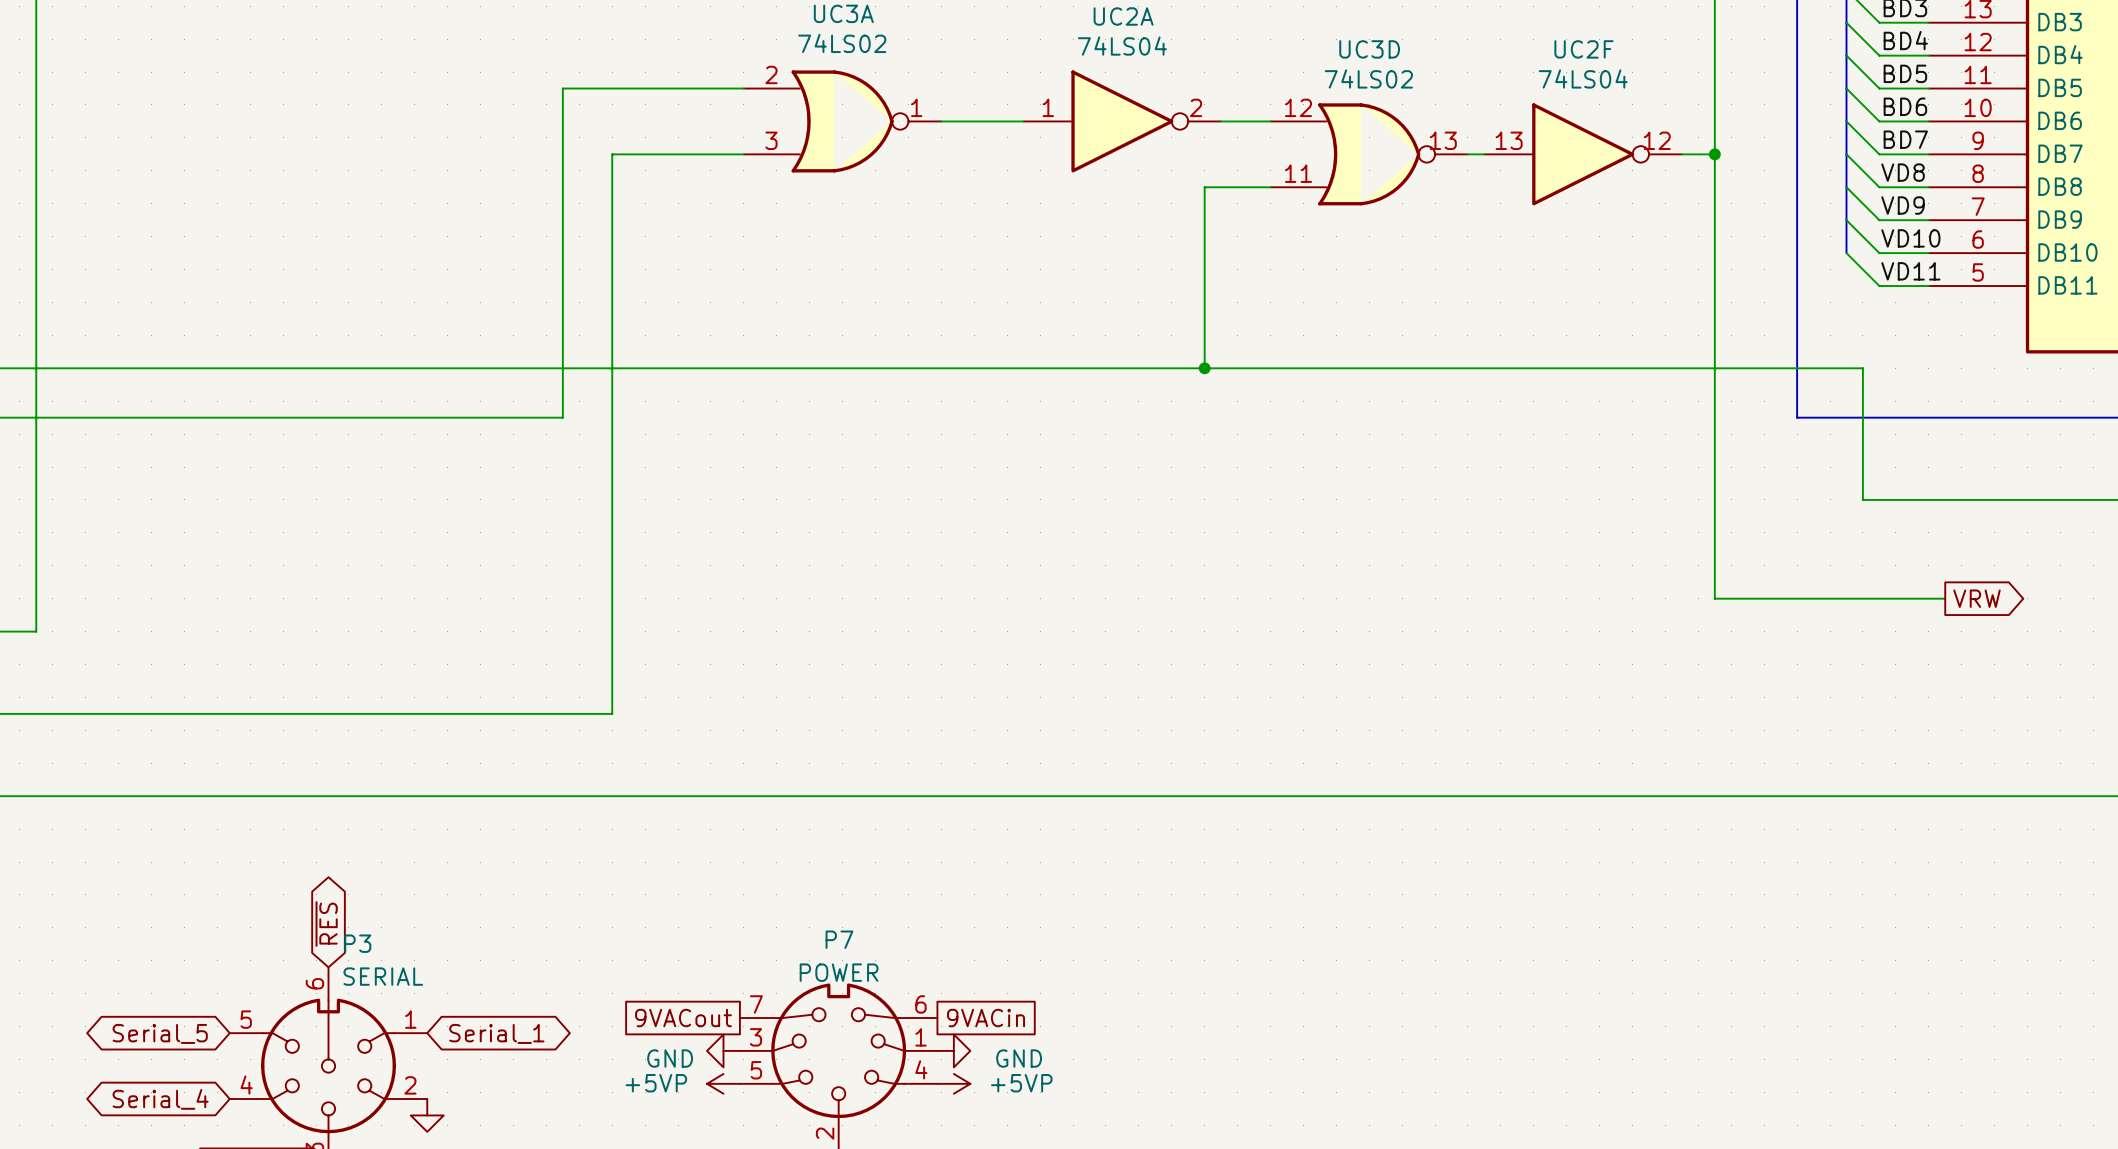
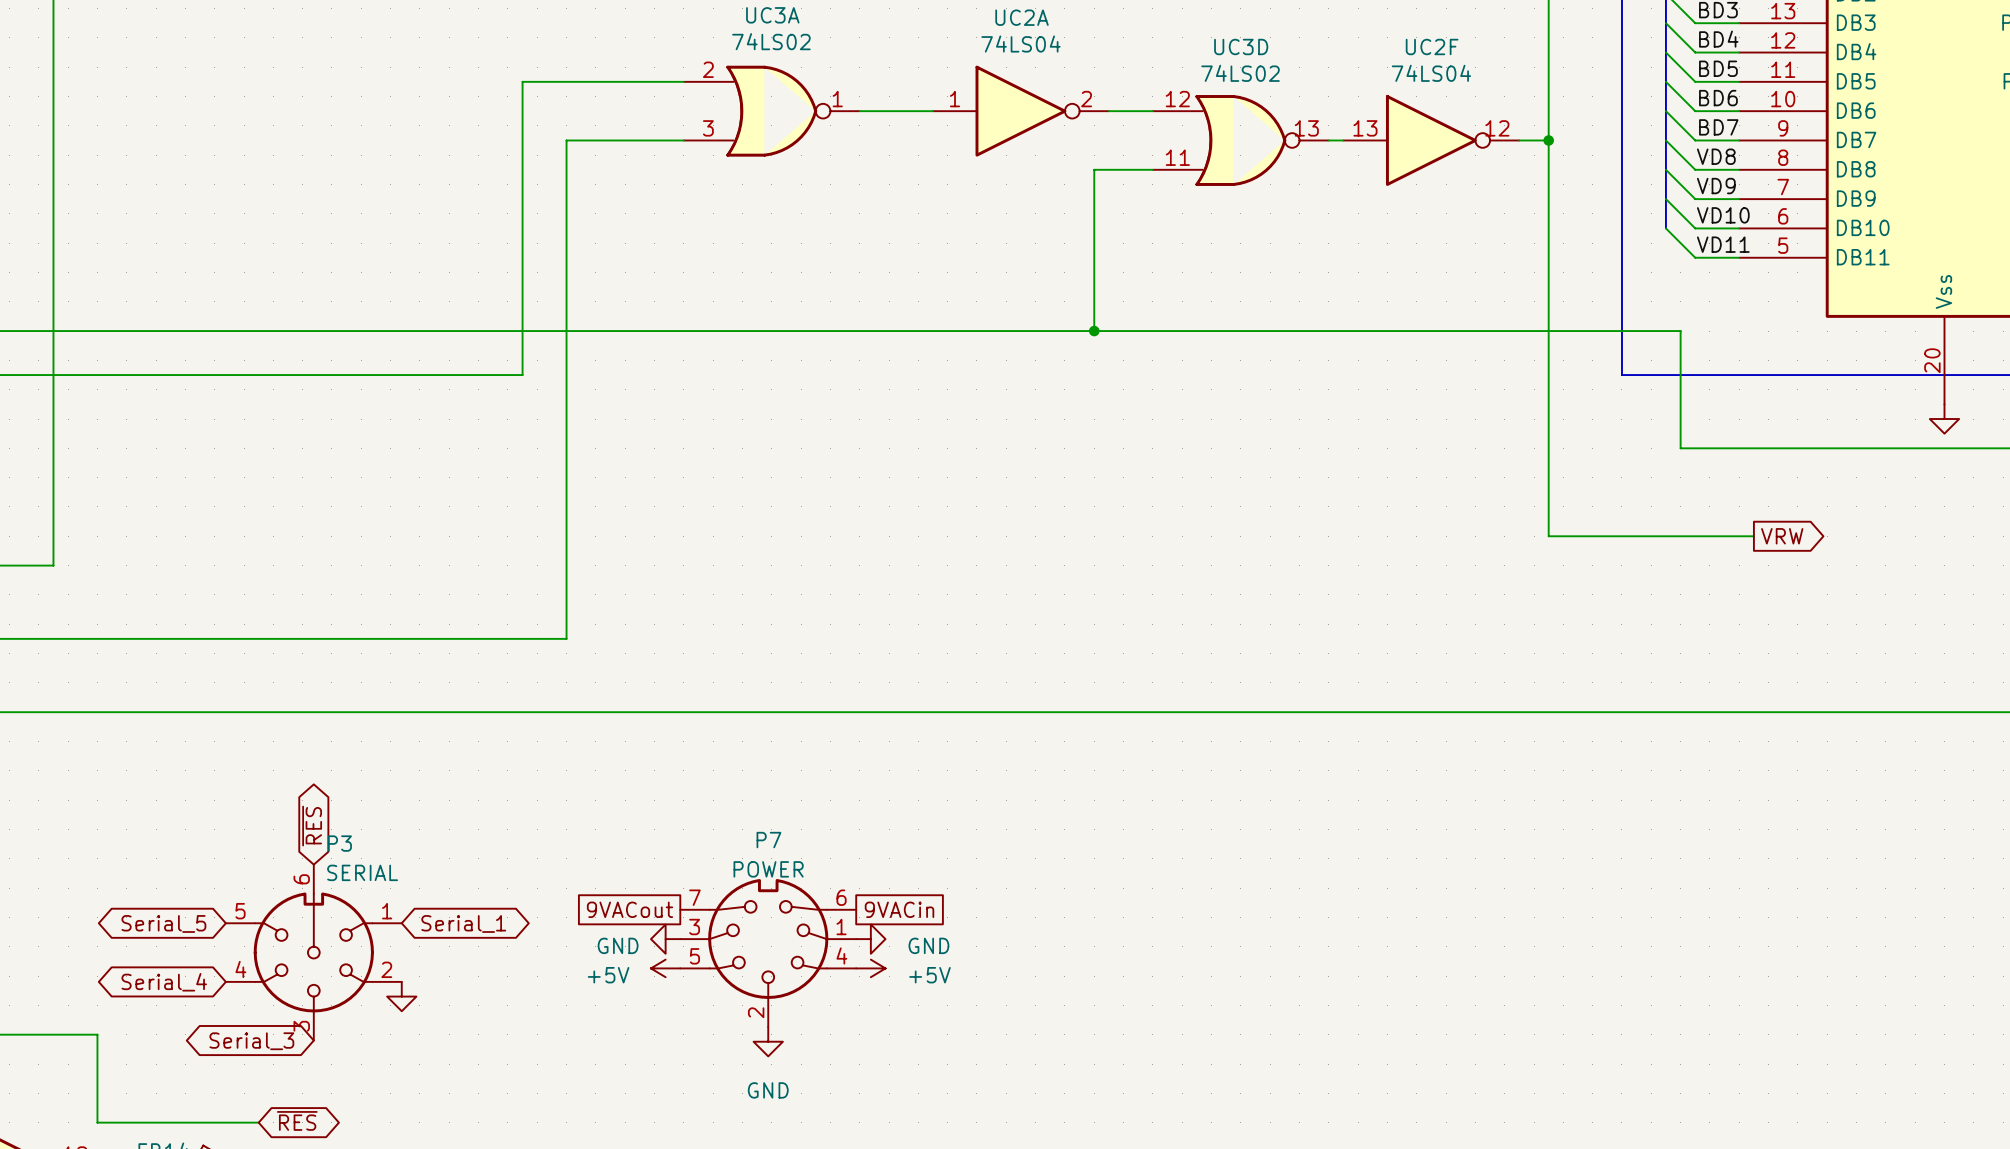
power symbol: +5VP (723, 1083) -> +5V (665, 968)
power symbol: +5VP (953, 1083) -> +5V (870, 968)

